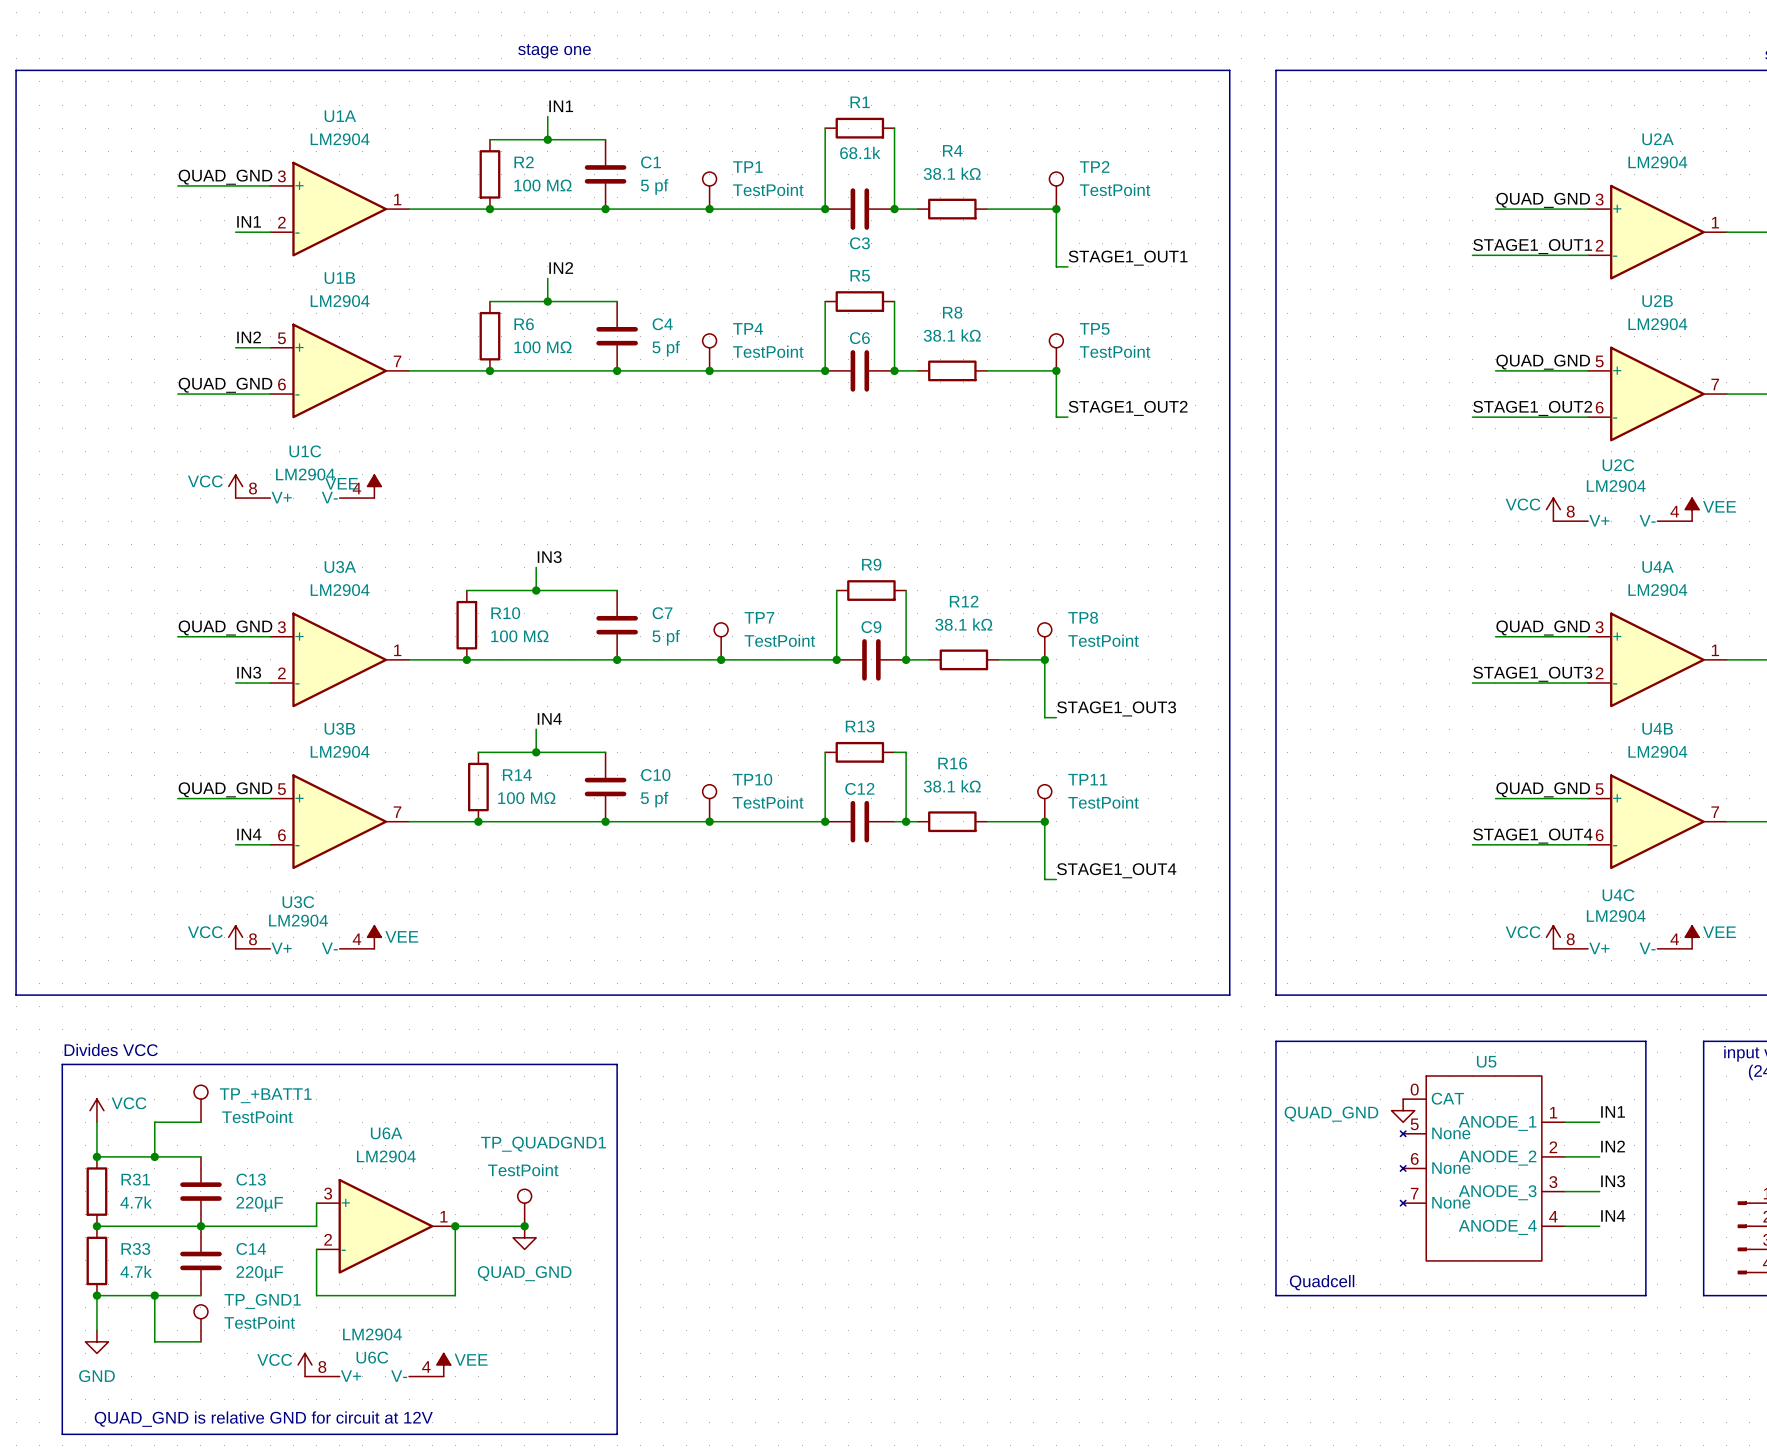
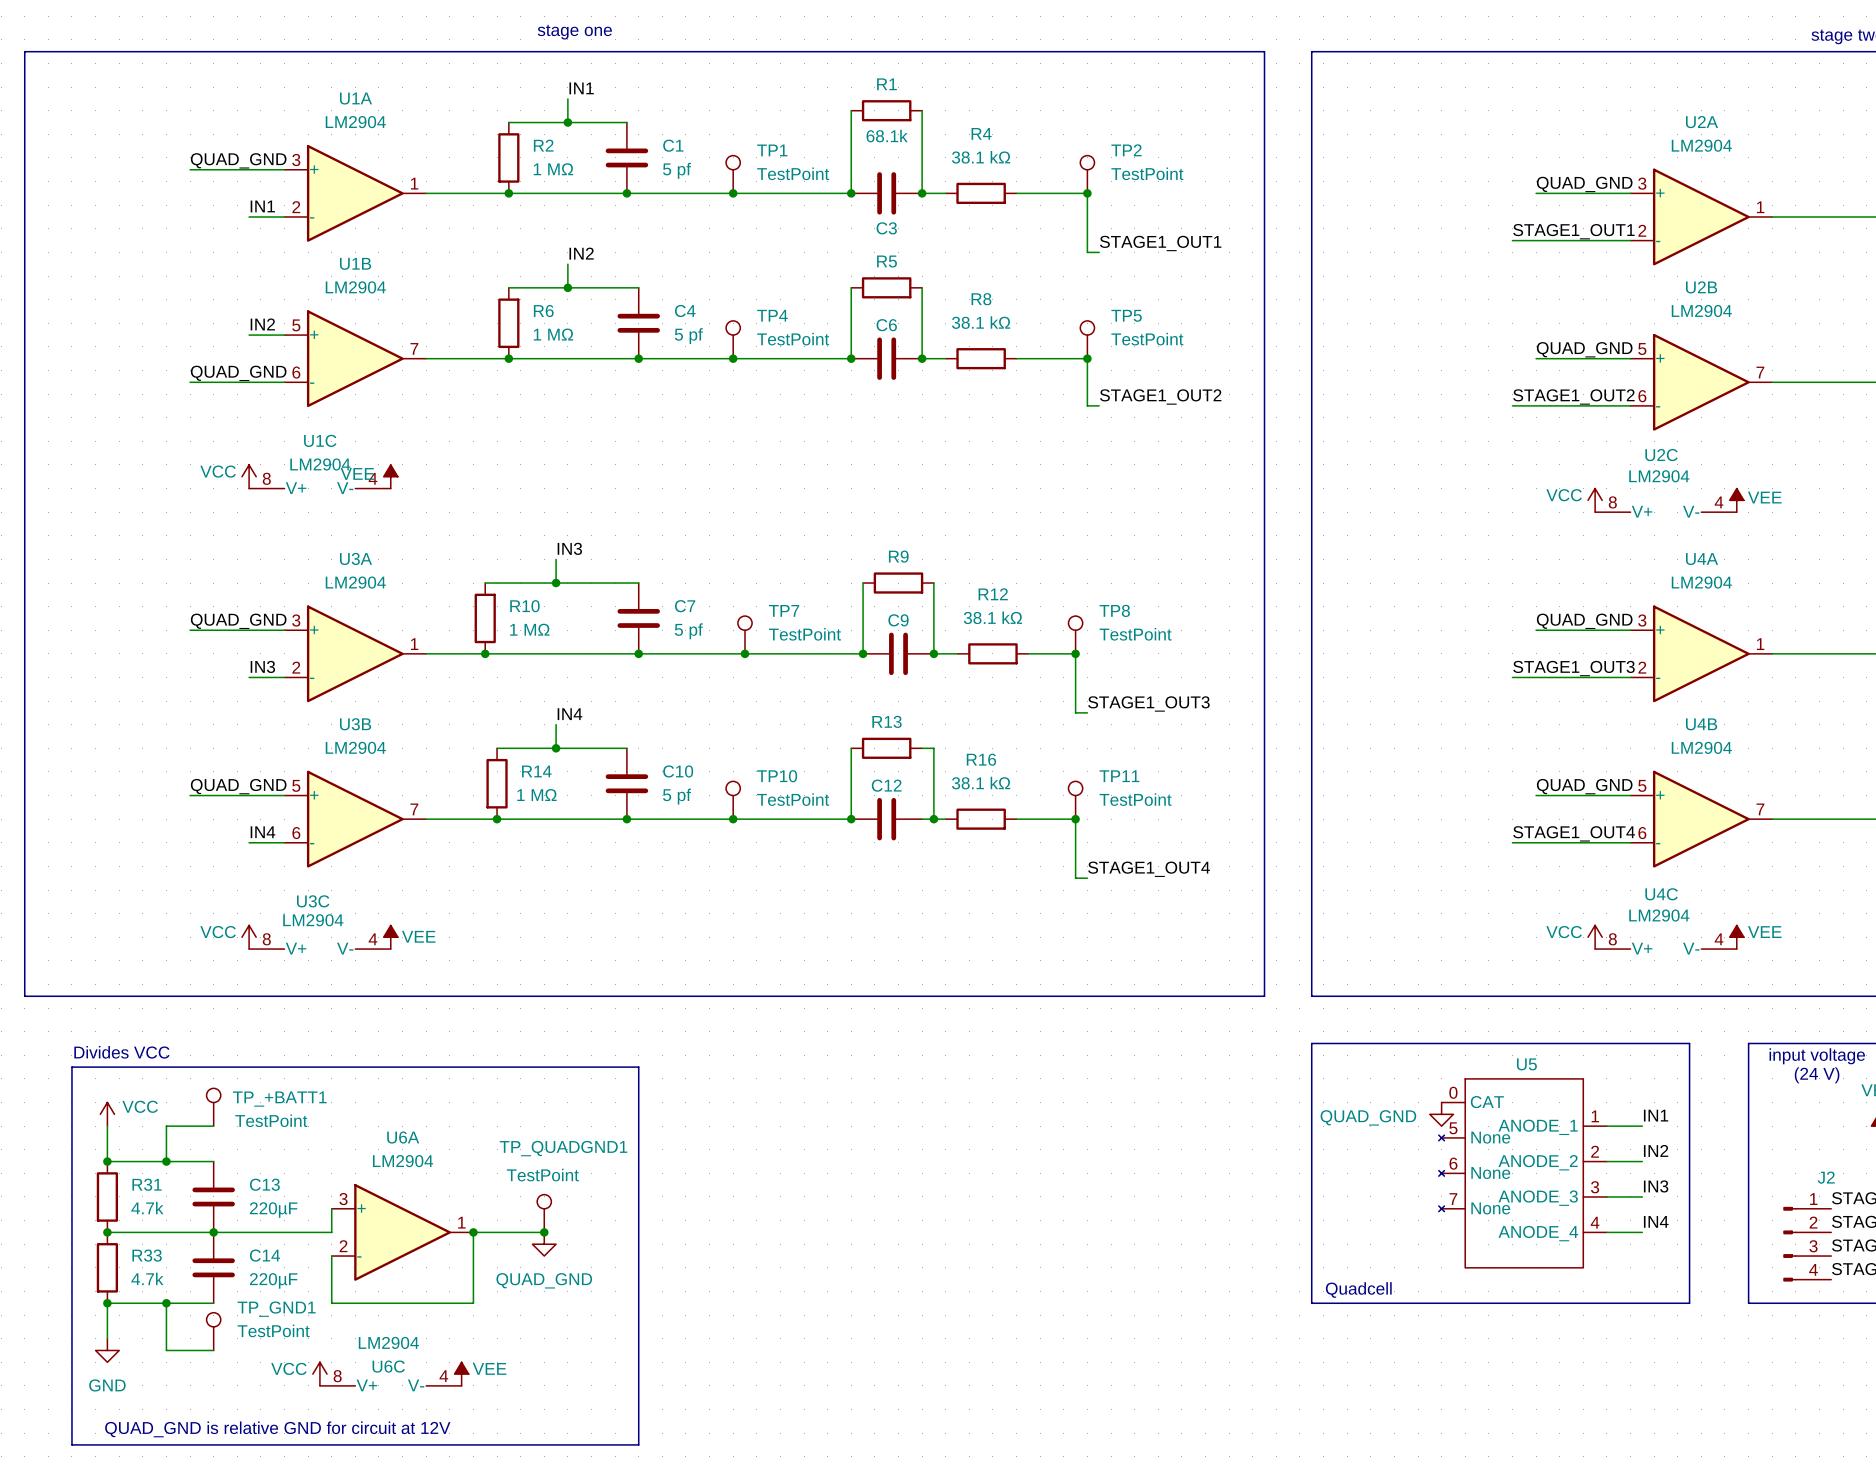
R2 value: 100 MΩ (542, 185) -> 1 MΩ (553, 169)
R6 value: 100 MΩ (542, 347) -> 1 MΩ (553, 334)
R10 value: 100 MΩ (519, 636) -> 1 MΩ (529, 629)
R14 value: 100 MΩ (526, 798) -> 1 MΩ (536, 795)

